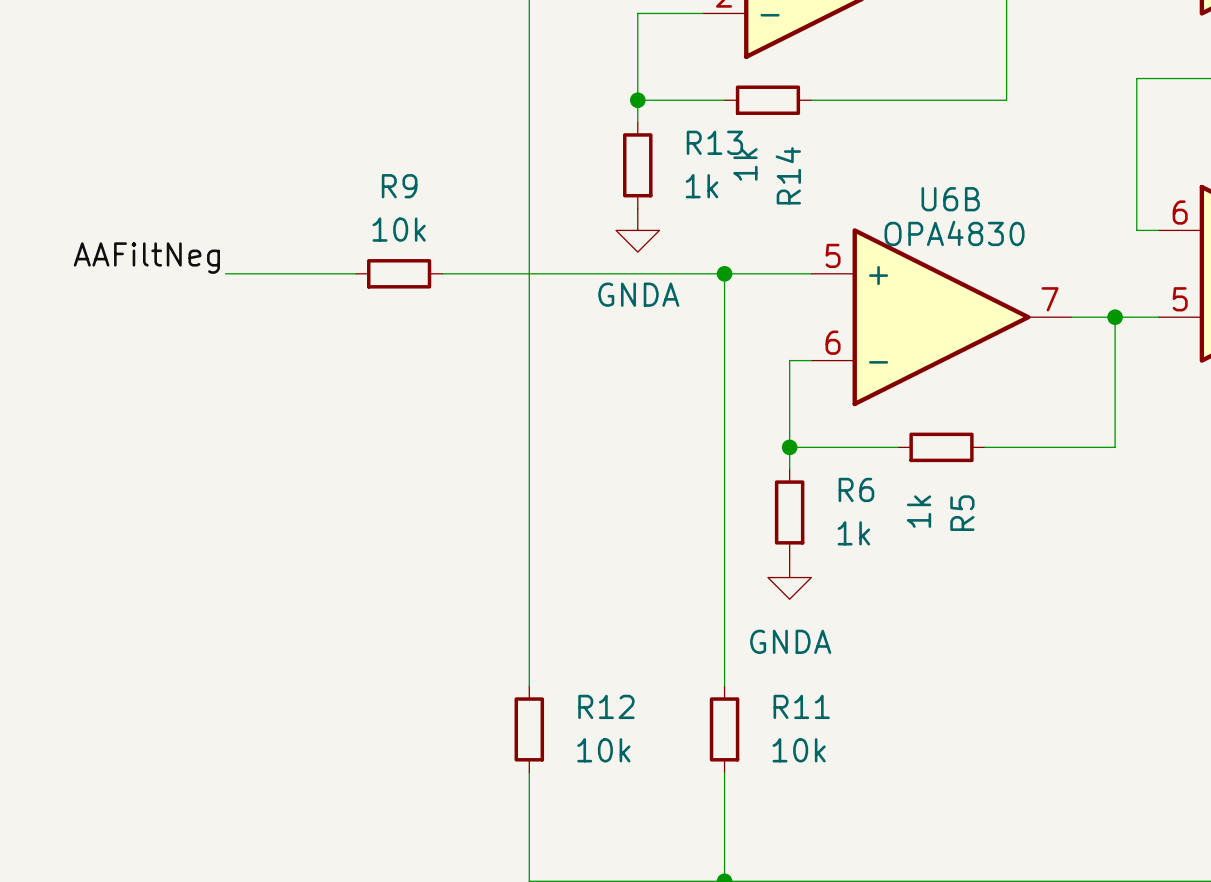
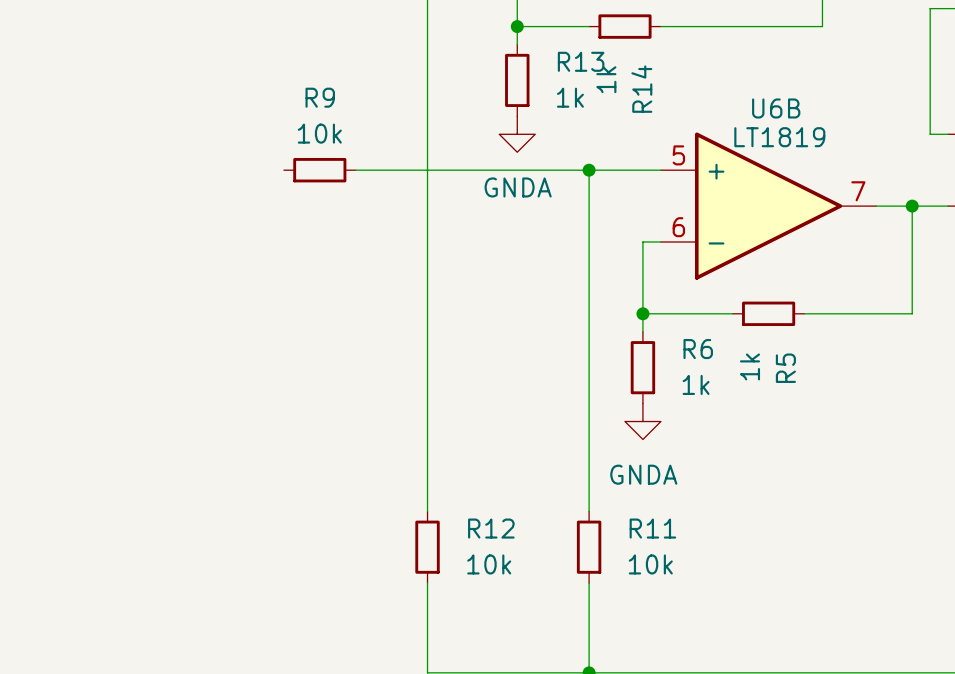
U6B value: OPA4830 (954, 233) -> LT1819 (779, 137)
label: AAFiltNeg (146, 258) -> none
wire: (225, 273) (355, 273) -> none

